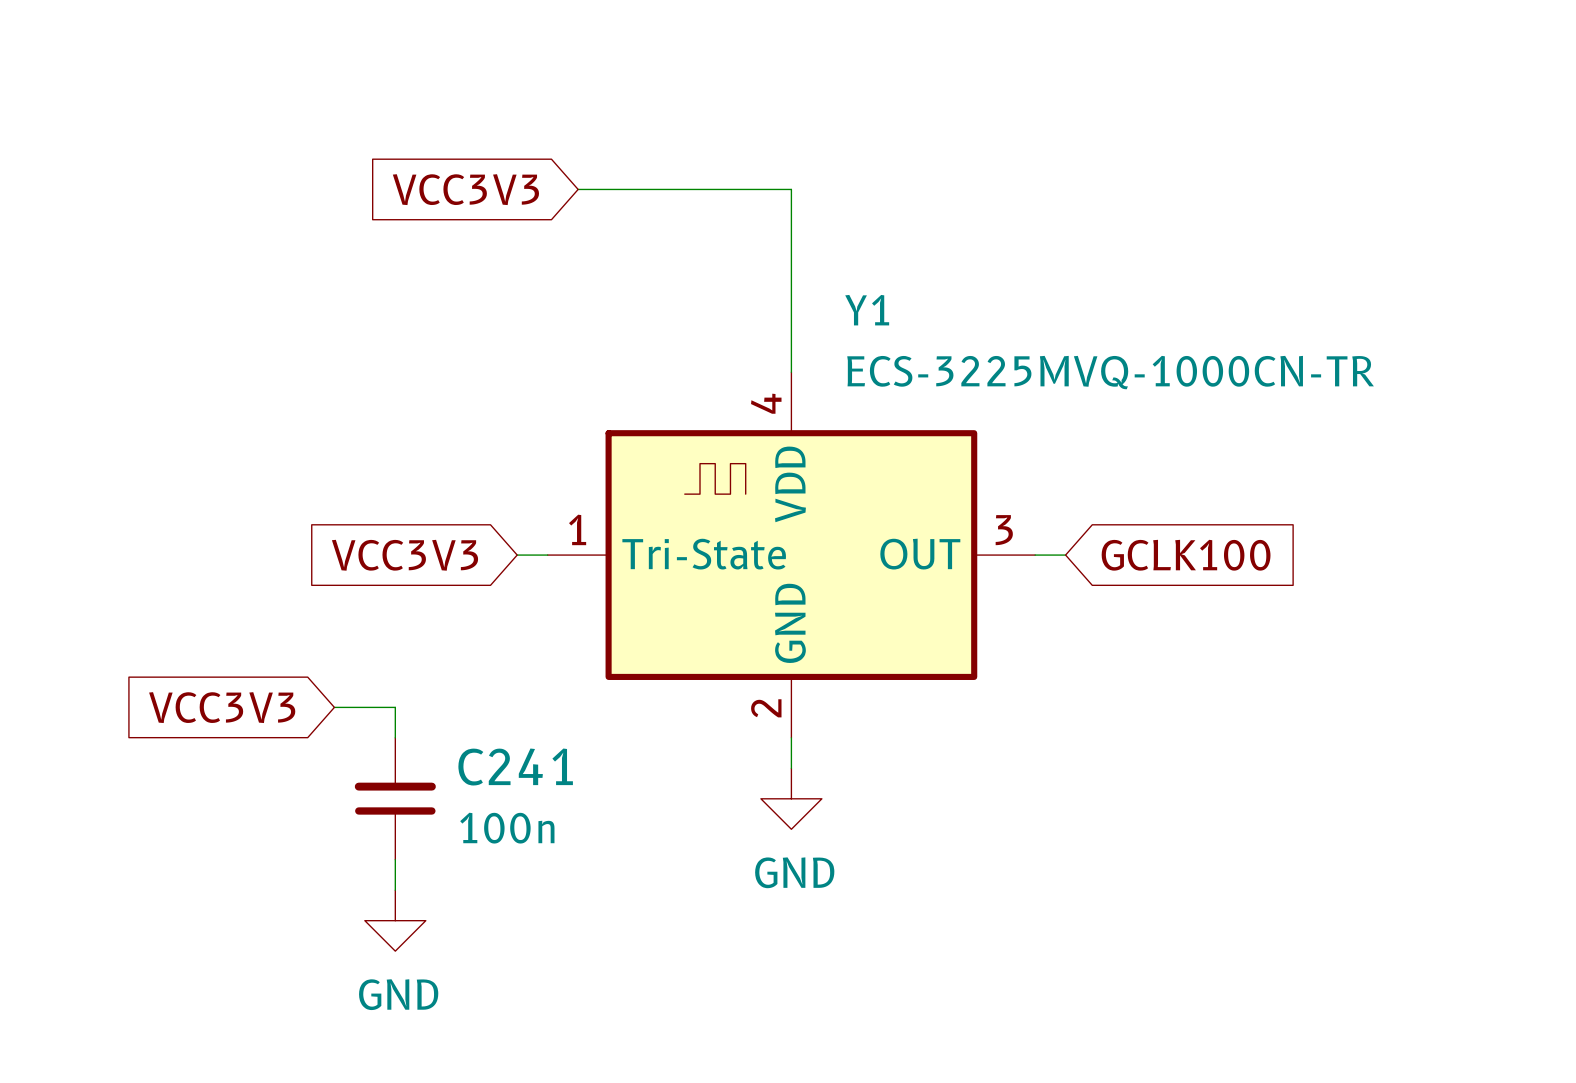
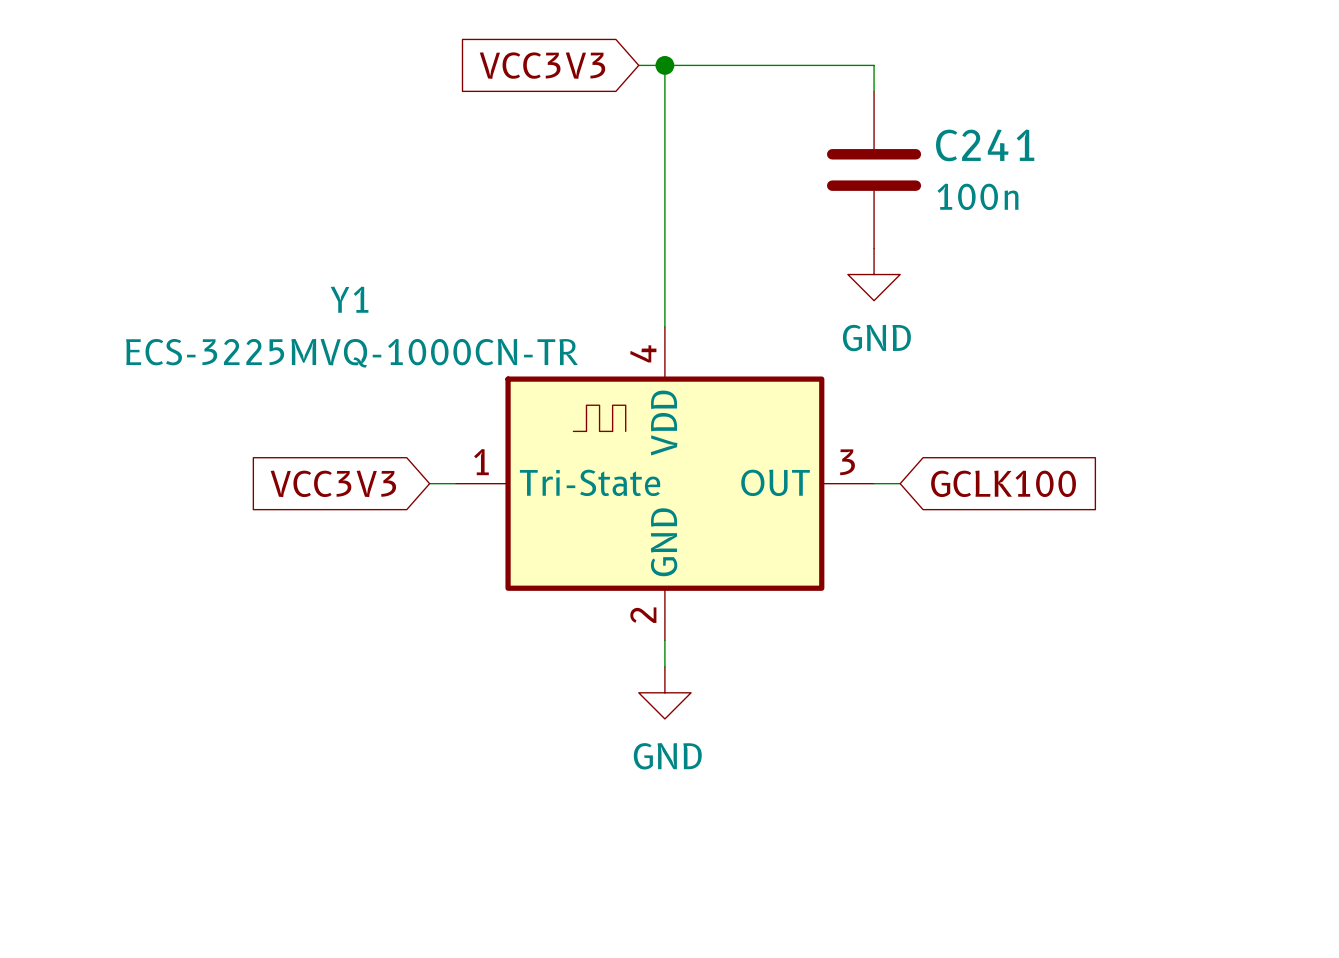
wire: none -> (638, 65) (874, 65) (874, 91)
junction: none -> (664, 65)
global label position: VCC3V3 (465, 189) -> VCC3V3 (542, 65)
wire: (578, 189) (791, 189) -> (664, 65) (664, 169)
Y1 name position: Y1 (867, 310) -> Y1 (349, 299)
power symbol: none -> GND (874, 274)
Y1 value position: ECS-3225MVQ-1000CN-TR (1110, 372) -> ECS-3225MVQ-1000CN-TR (352, 353)
global label: VCC3V3 (222, 707) -> none
wire: (334, 707) (395, 707) (395, 737) -> none
C241 symbol: [354, 737, 436, 860] -> [826, 91, 922, 249]
wire: (395, 859) (395, 890) -> none
power symbol: GND (395, 920) -> none

